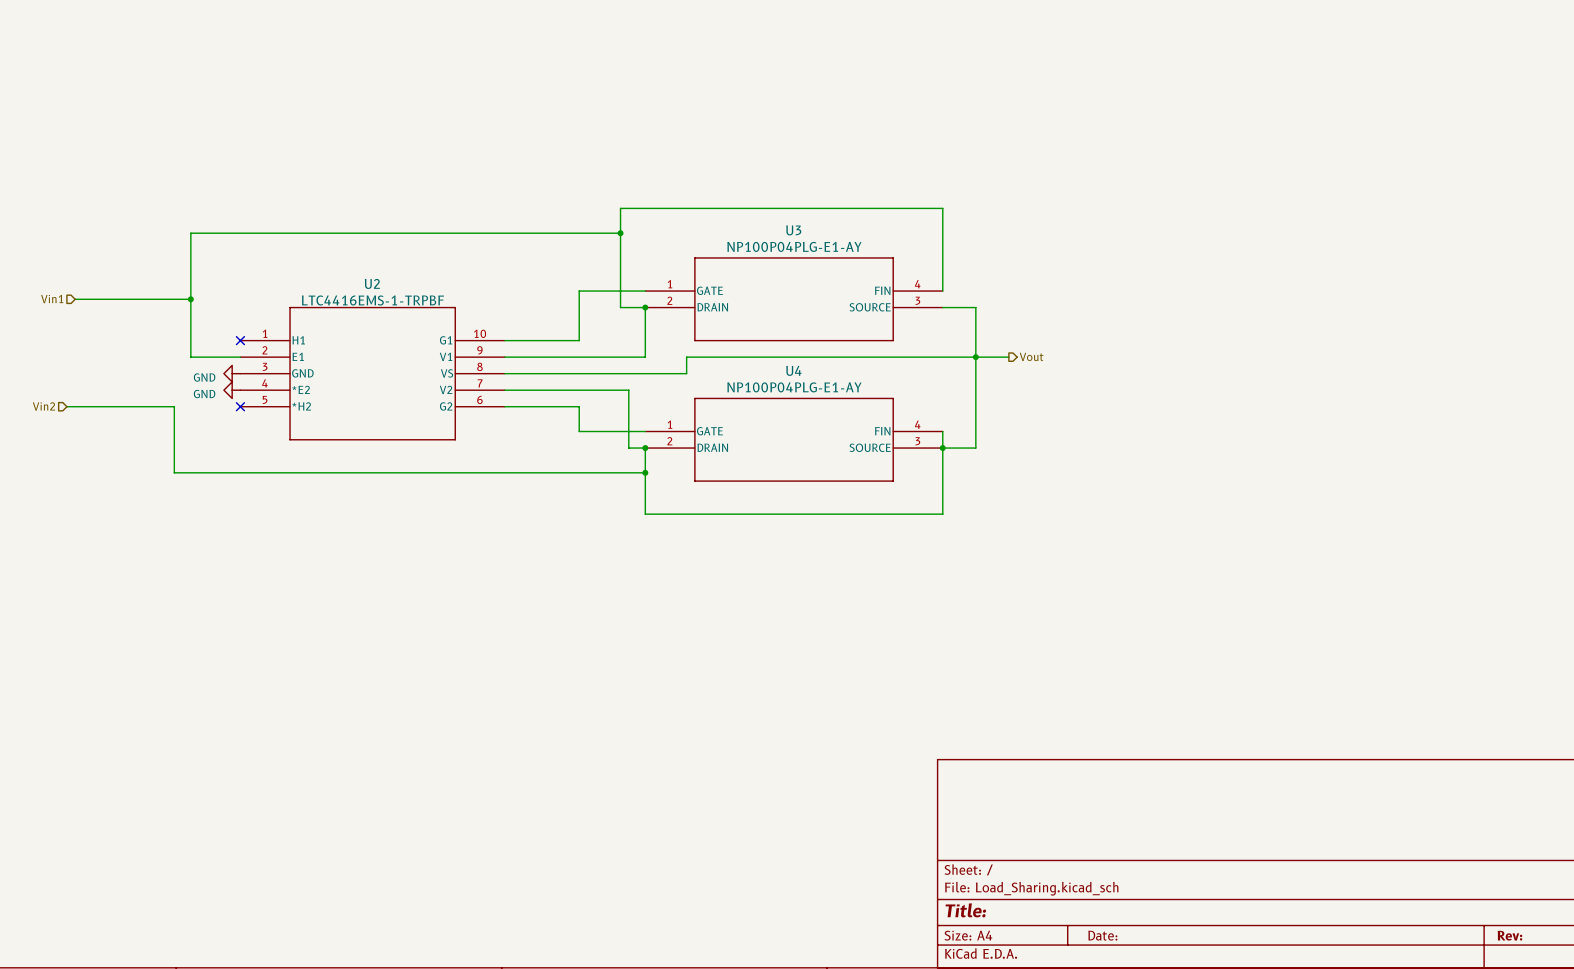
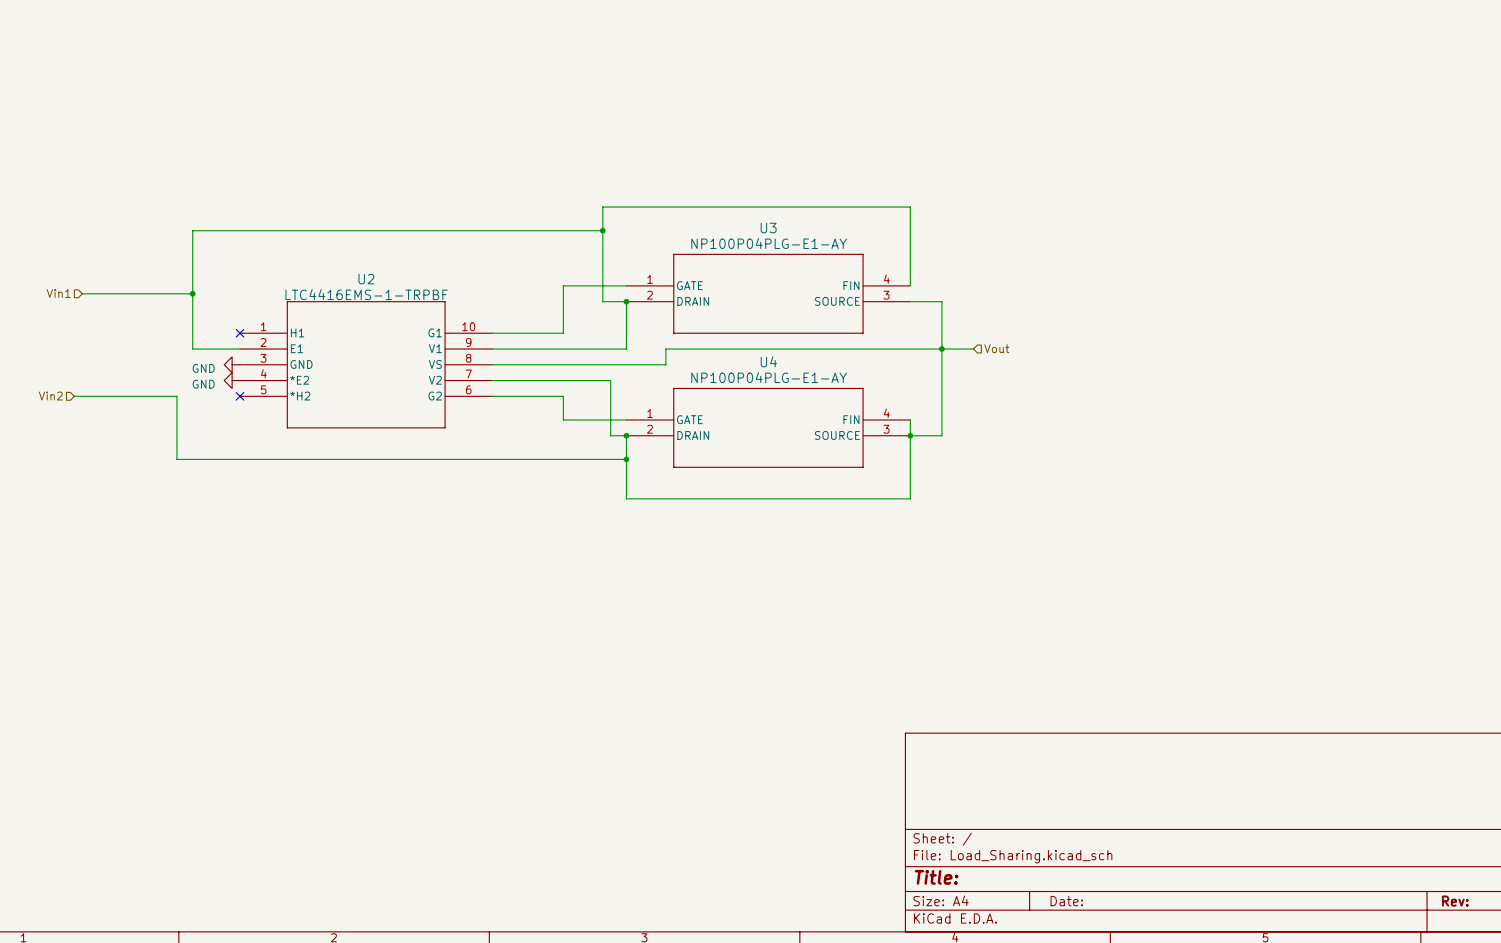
hierarchical label shape: output (1031, 356) -> input (996, 348)

